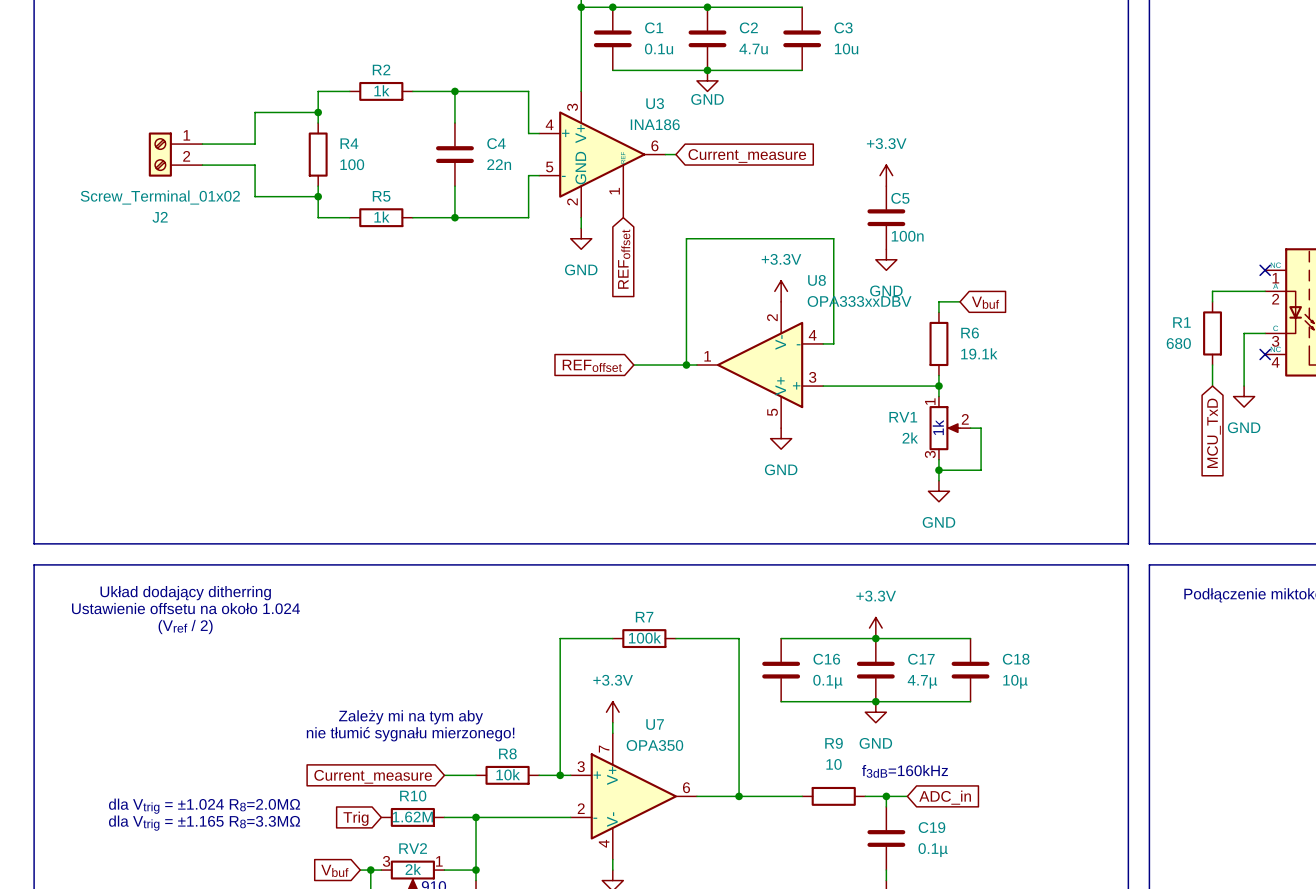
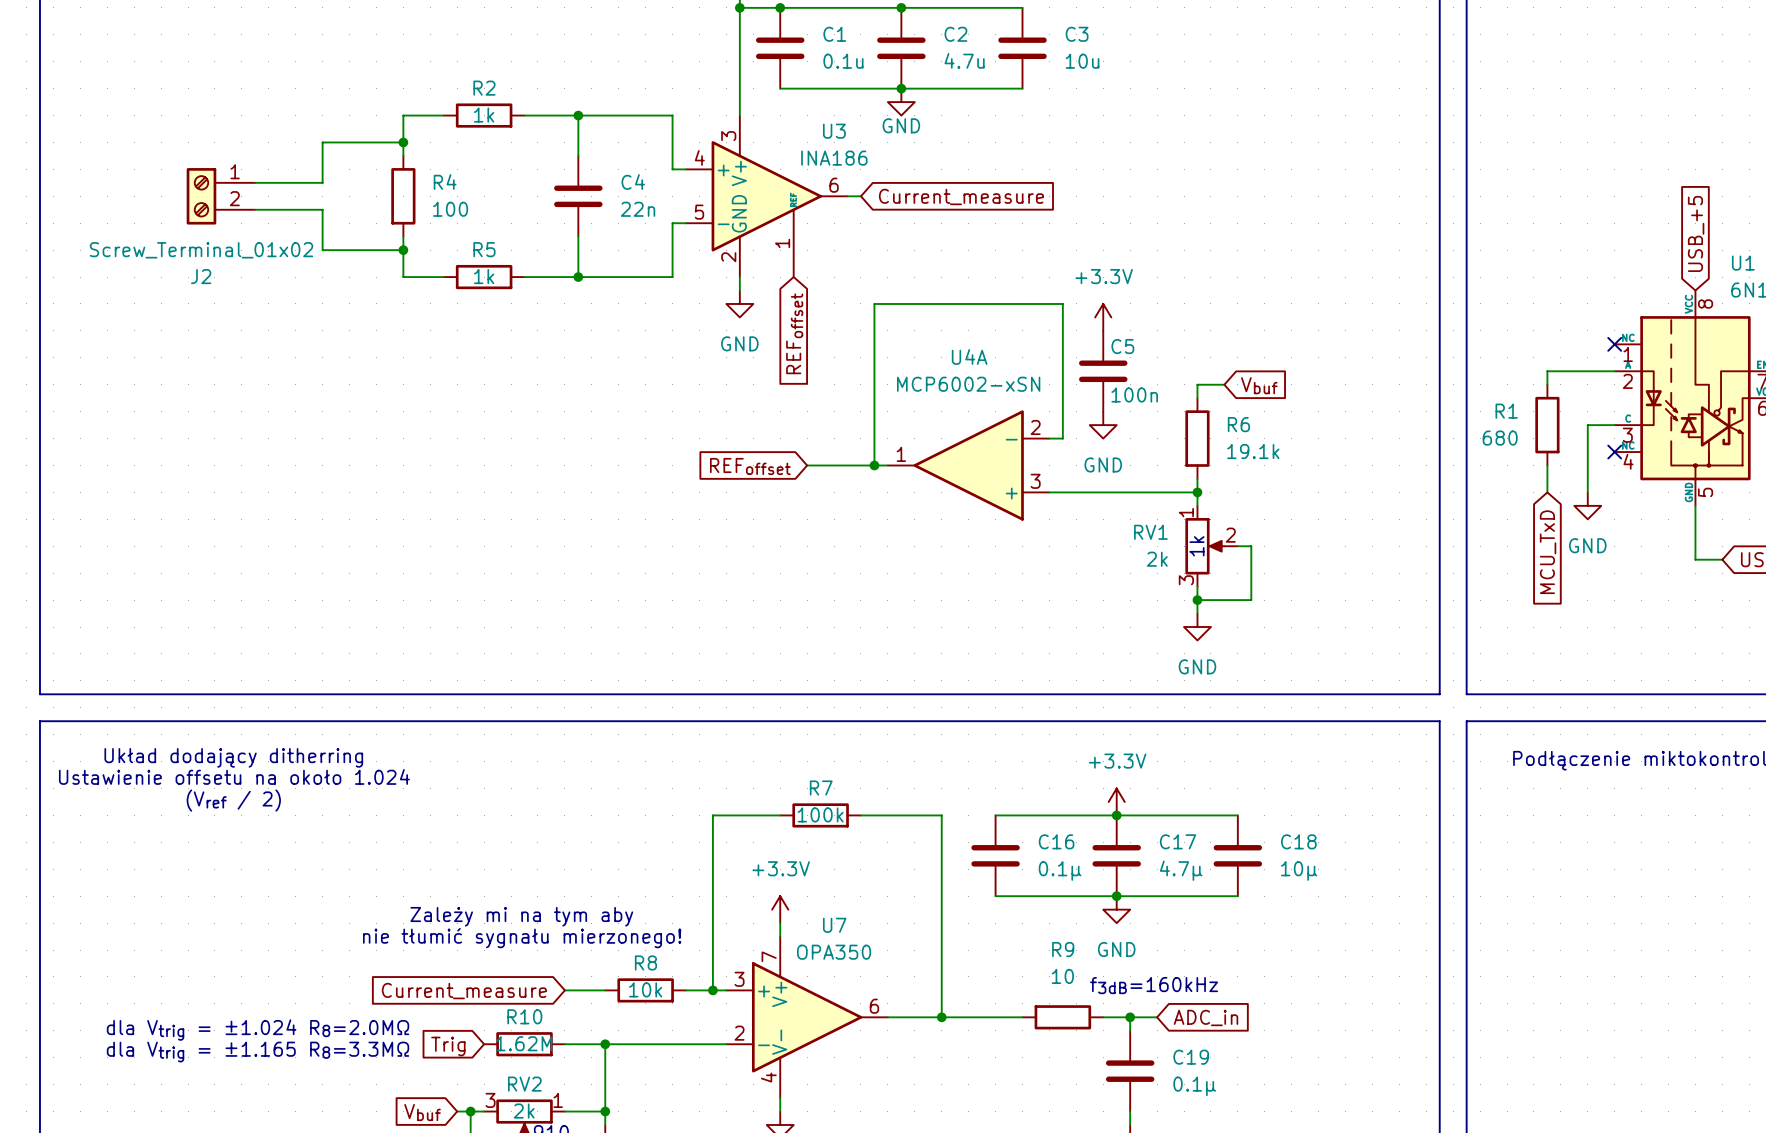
power symbol: +3.3V (886, 175) -> none
C5 position: (886, 217) -> (1103, 371)
power symbol: none -> +3.3V (1103, 317)
power symbol: GND (886, 259) -> none
power symbol: +3.3V (781, 291) -> none
power symbol: none -> GND (1103, 425)
U8: OPA333xxDBV (760, 365) -> none
U4A: none -> MCP6002-xSN (968, 465)
power symbol: GND (781, 438) -> none

